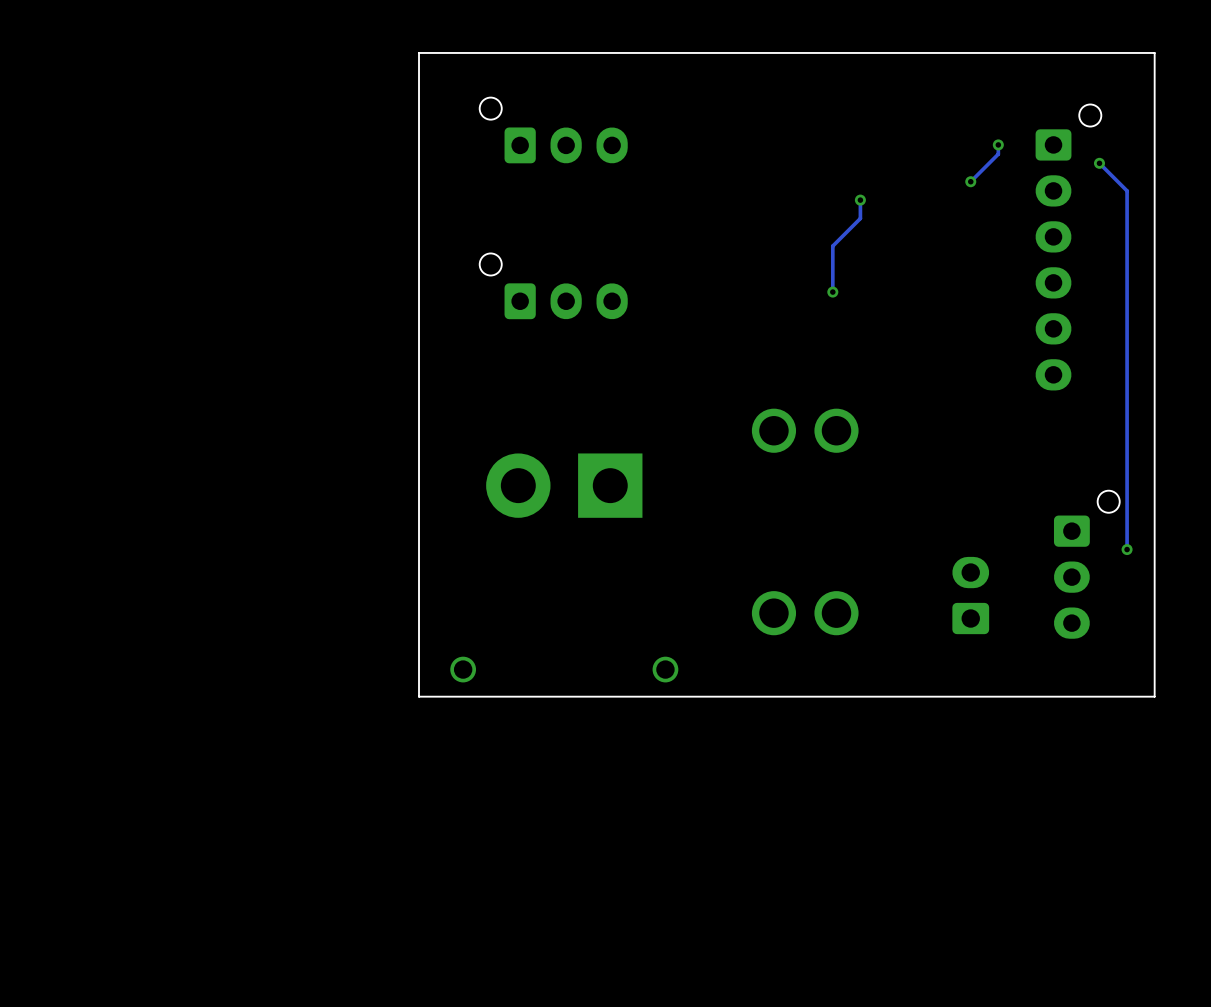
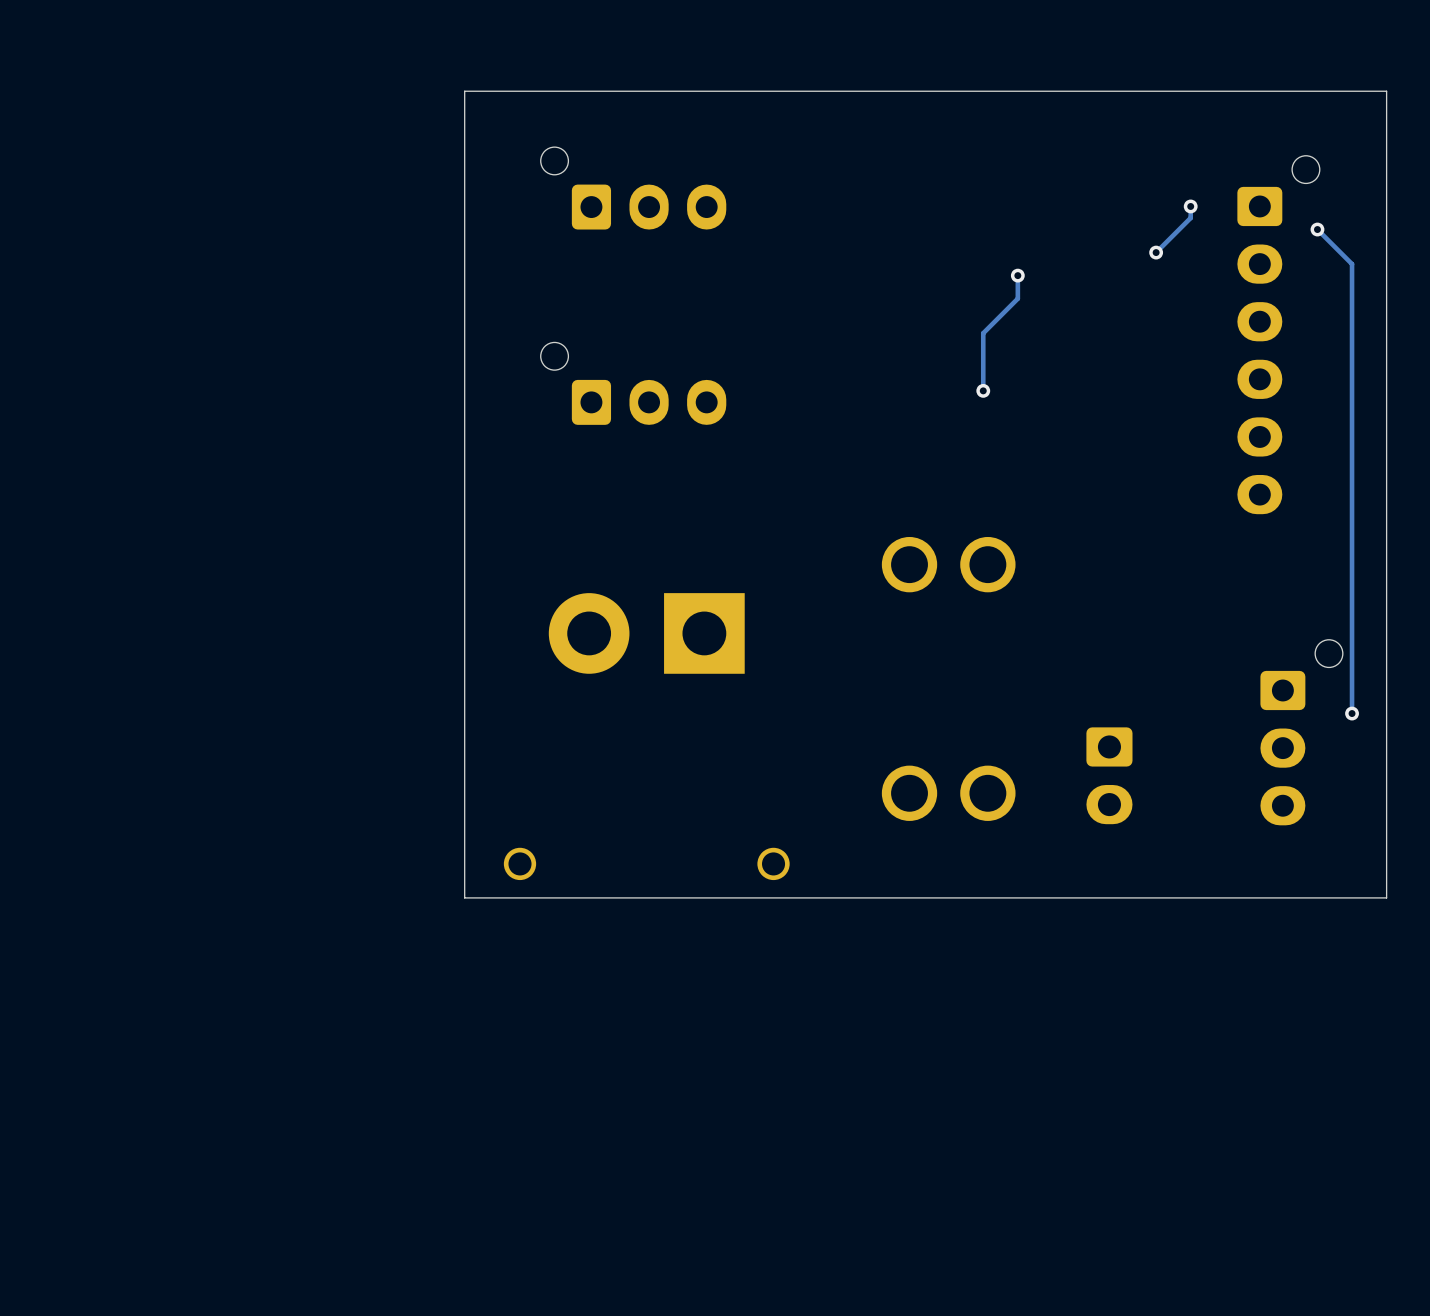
part rotation: 0° (970, 595) -> 180° (1109, 775)

